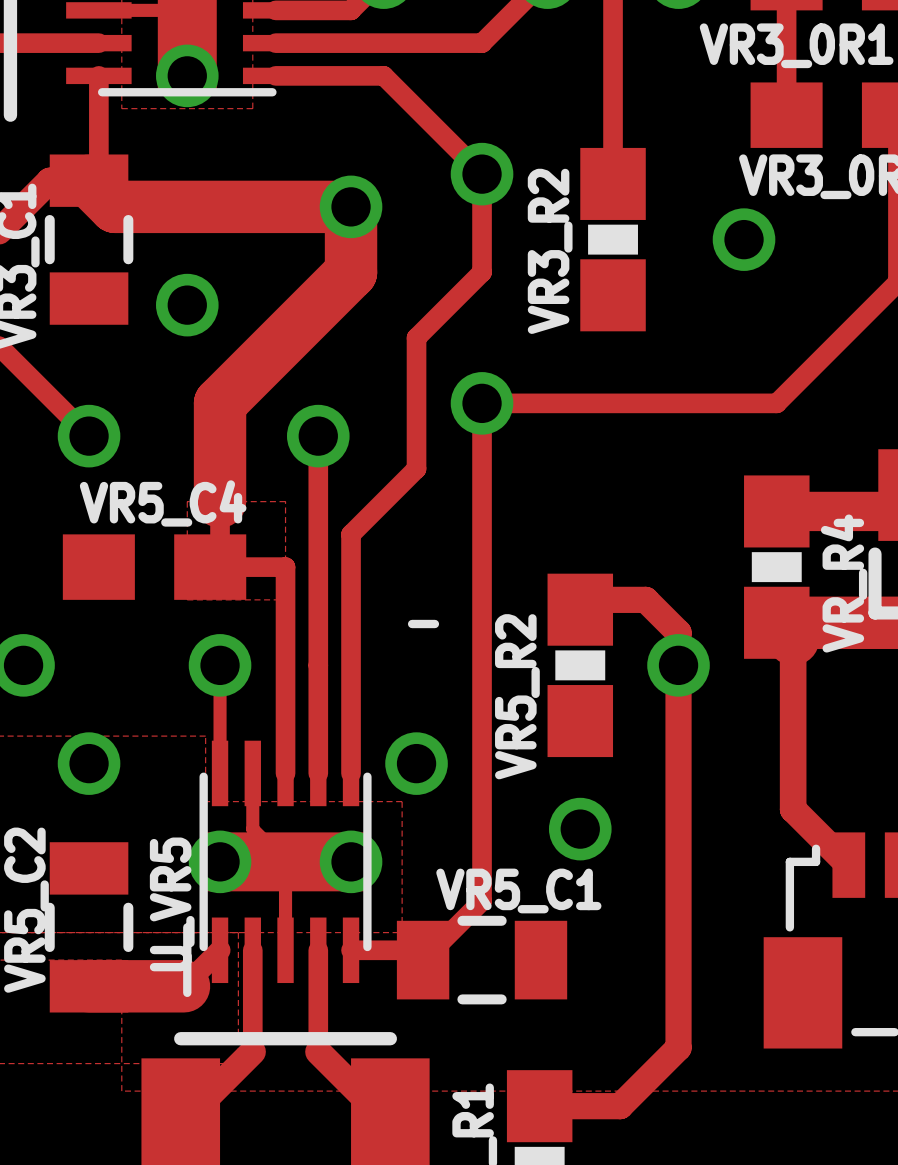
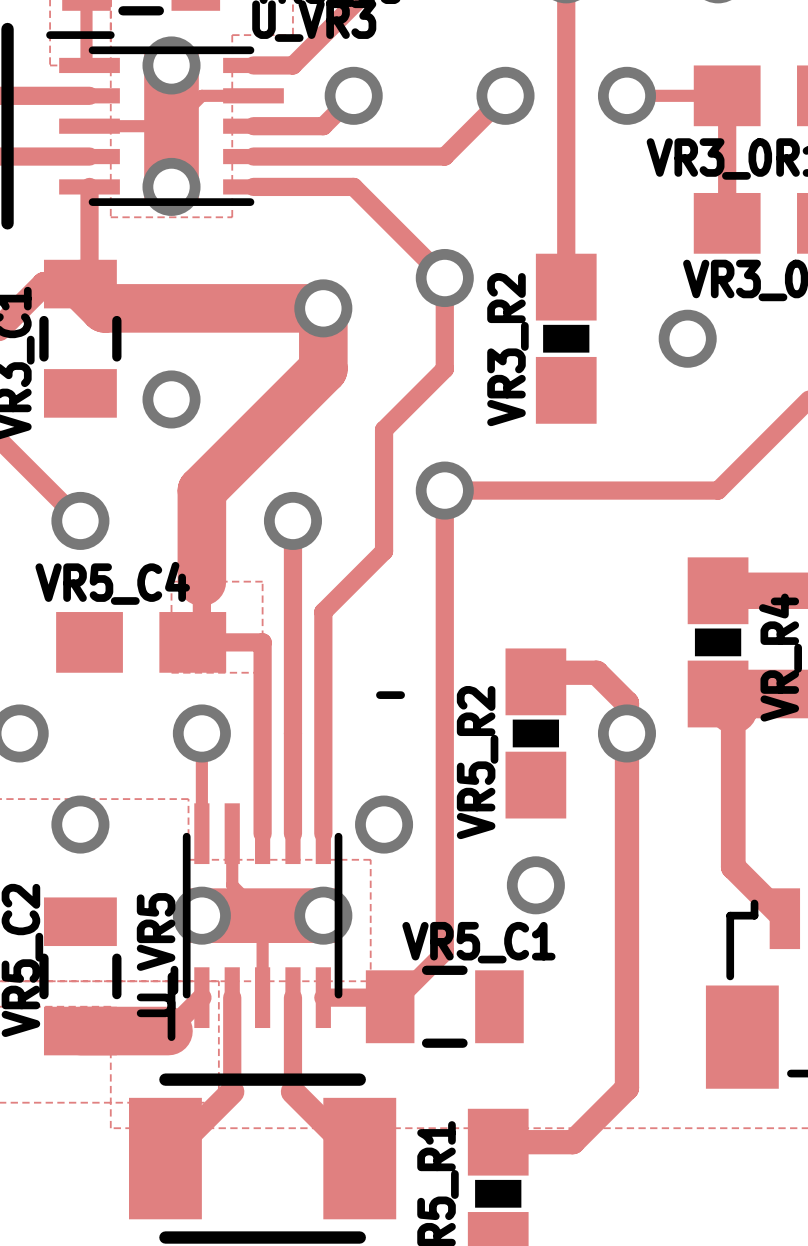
VR5_C4 name position: VR5_C4 (163, 503) -> VR5_C4 (112, 583)

